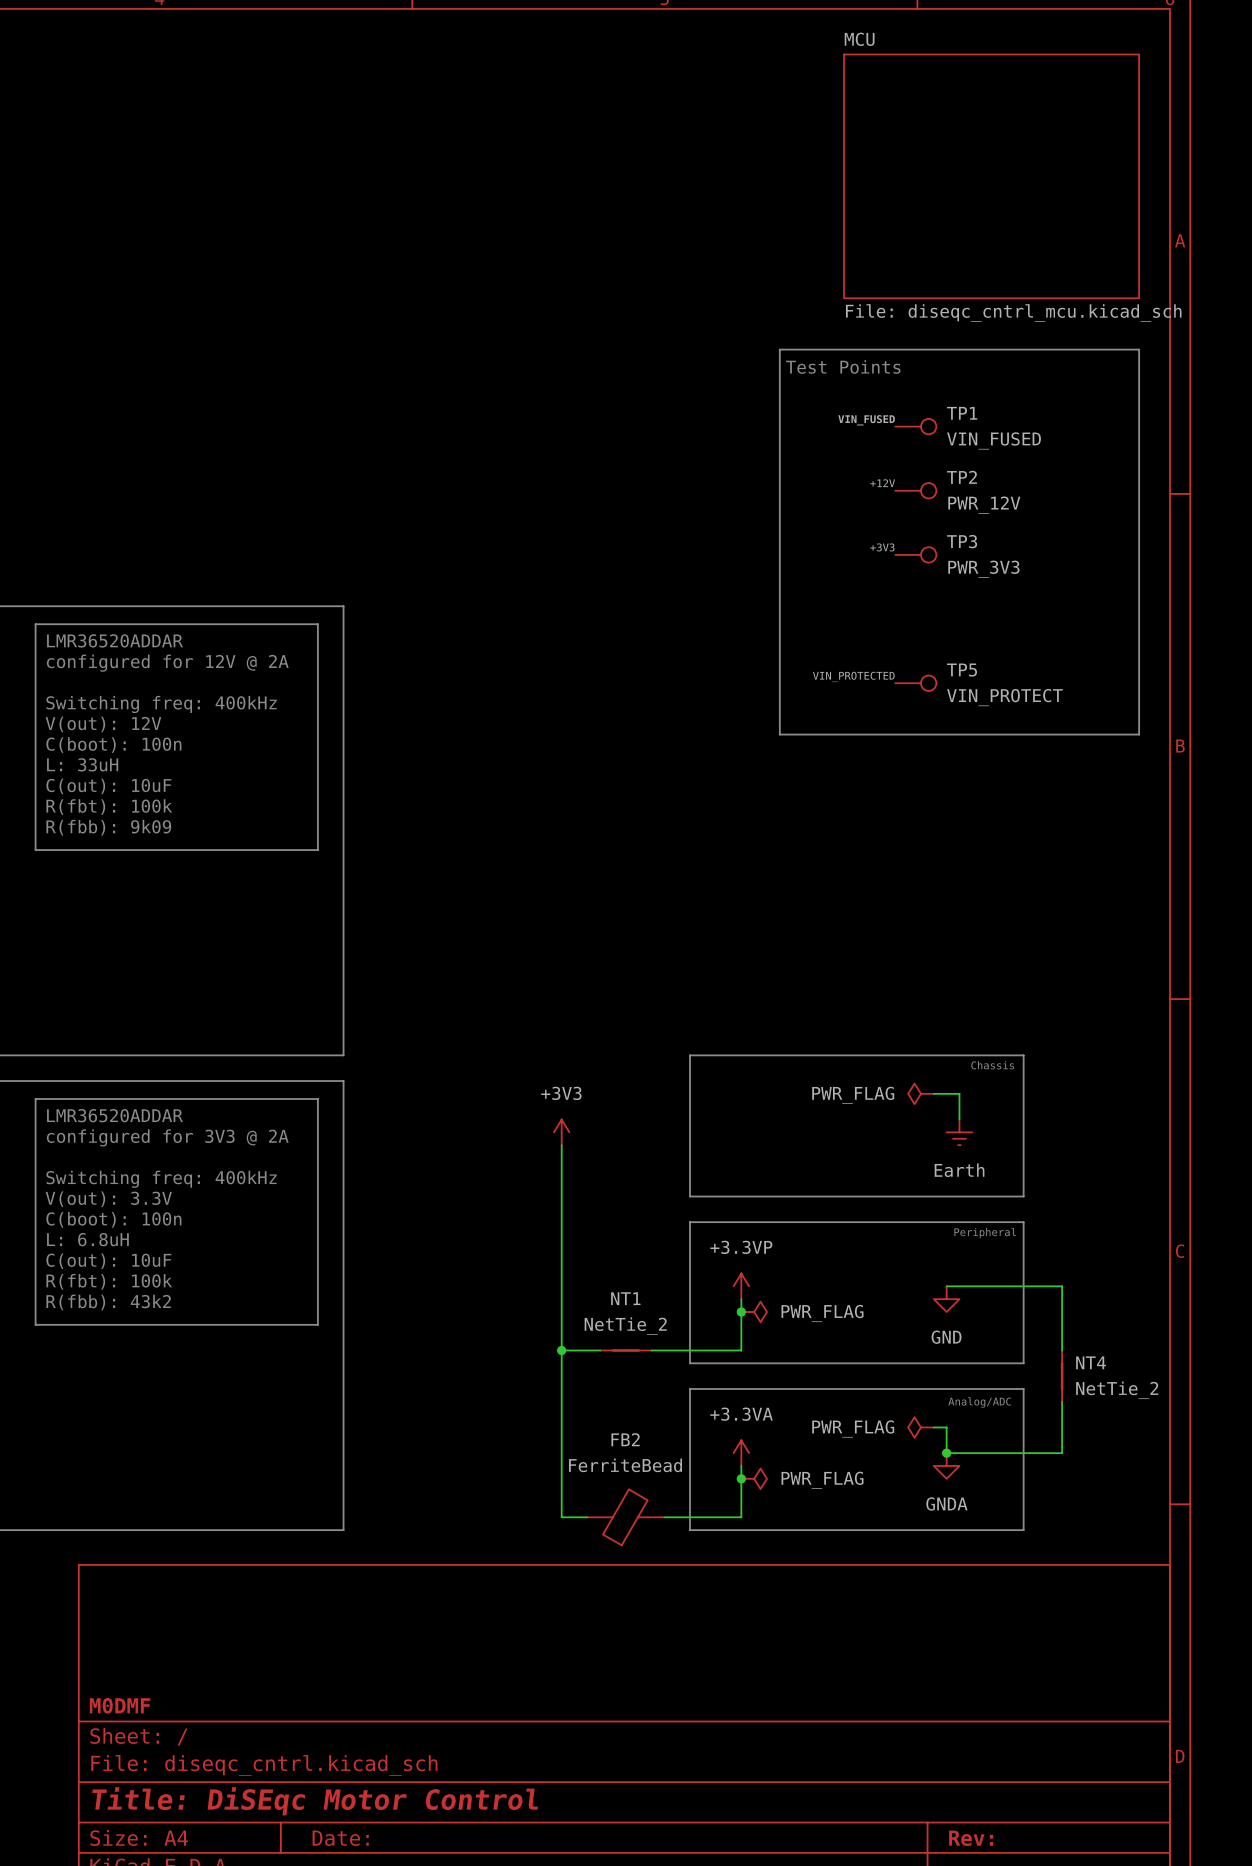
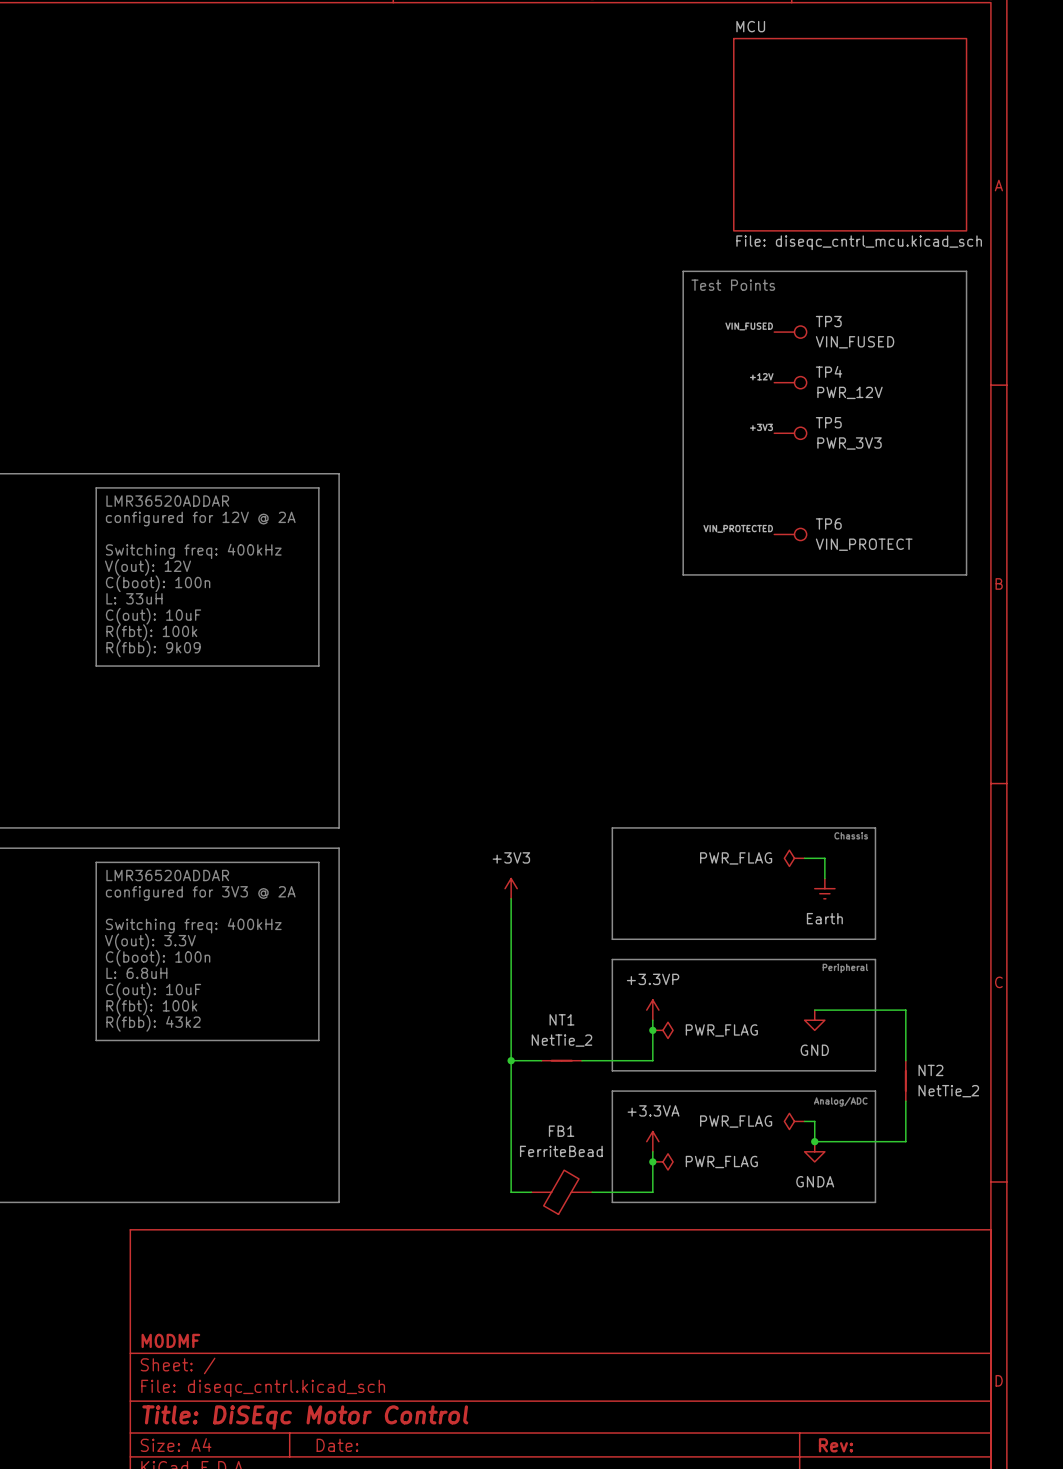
TP1 name: TP1 (962, 413) -> TP3 (828, 321)
TP2 name: TP2 (961, 477) -> TP4 (829, 371)
TP3 name: TP3 (962, 541) -> TP5 (828, 422)
TP5 name: TP5 (962, 670) -> TP6 (828, 523)
NT4 name: NT4 (1091, 1362) -> NT2 (930, 1070)
FB2 name: FB2 (625, 1439) -> FB1 (561, 1131)

